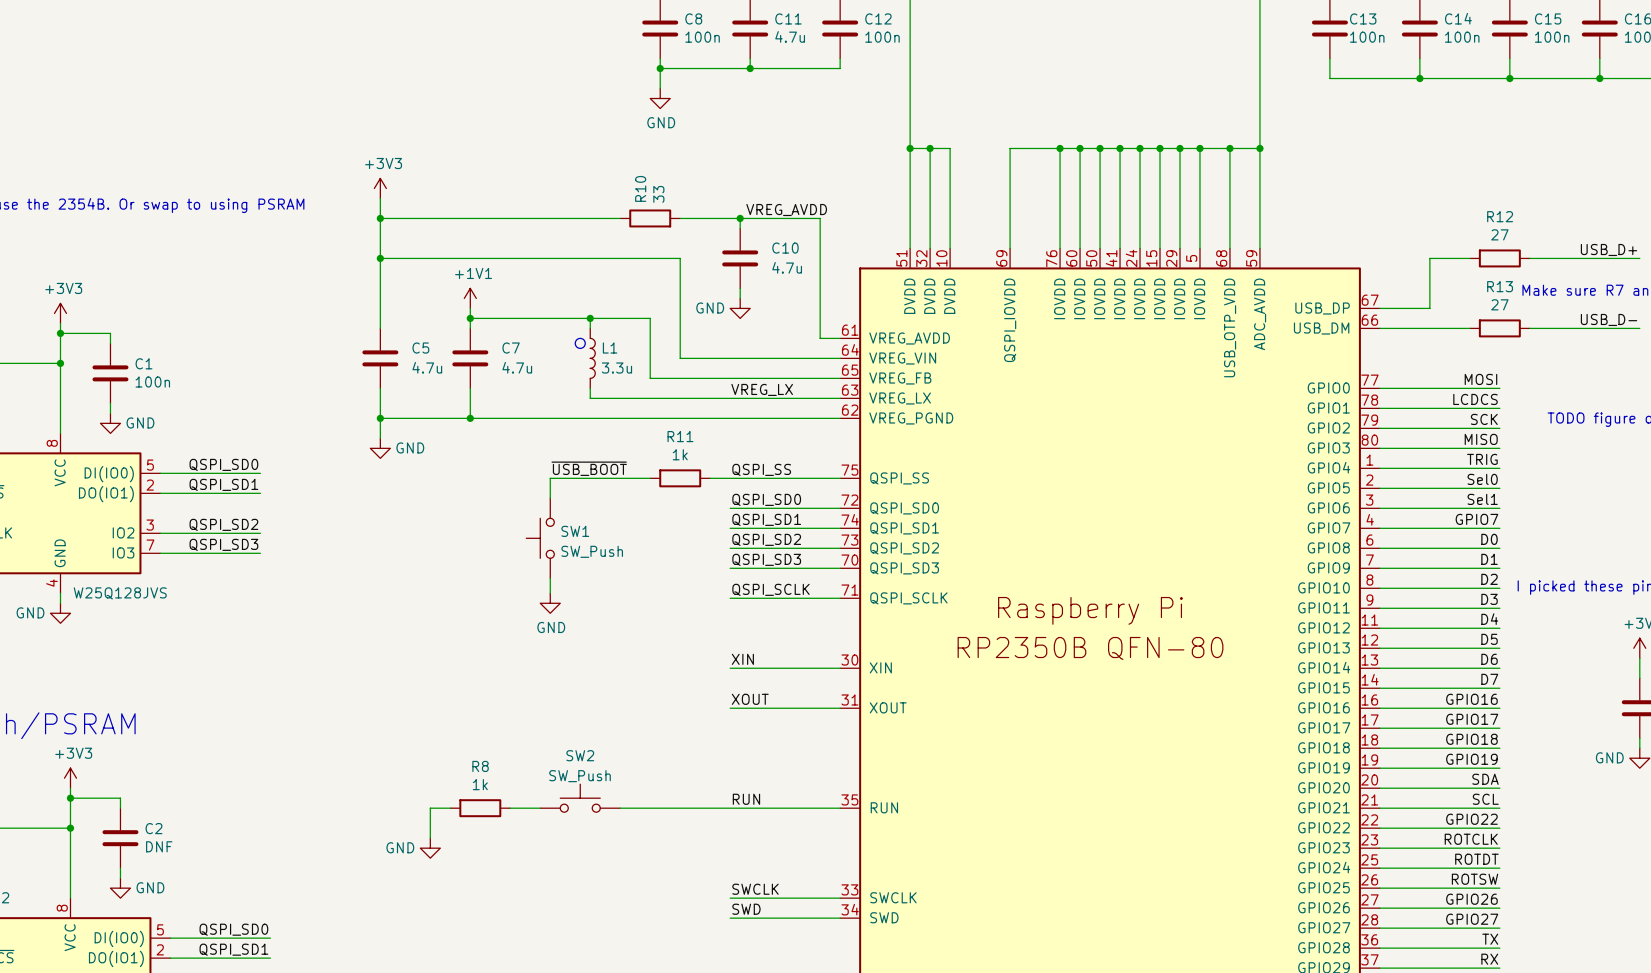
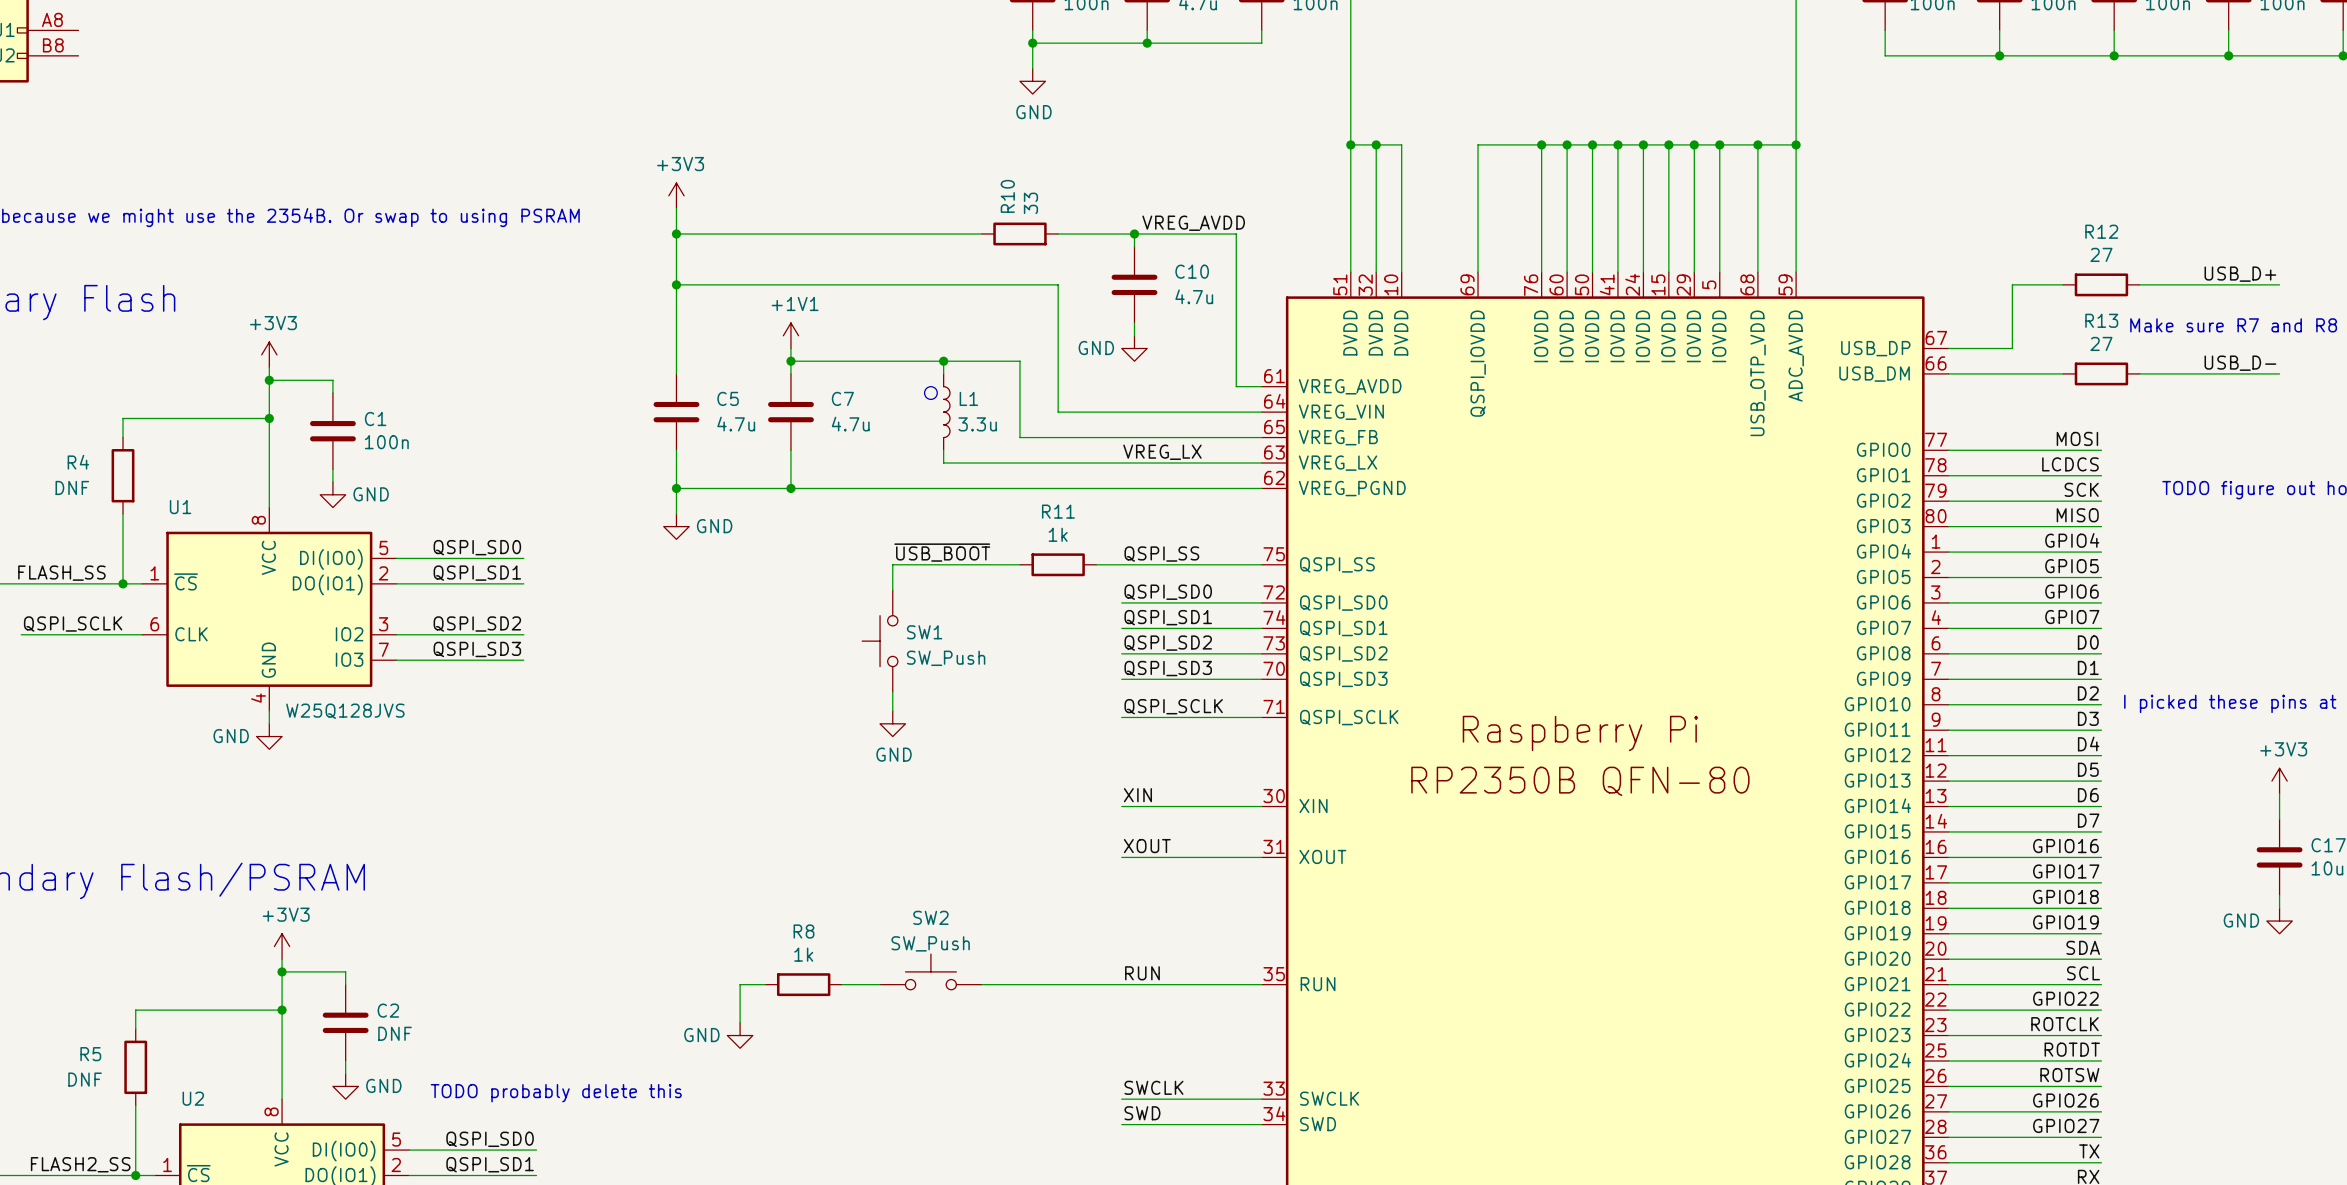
label: TRIG (1482, 459) -> GPIO4 (2072, 540)
label: Sel0 (1482, 479) -> GPIO5 (2071, 566)
label: Sel1 (1482, 499) -> GPIO6 (2071, 591)
text: none -> TODO probably delete this (556, 1093)

